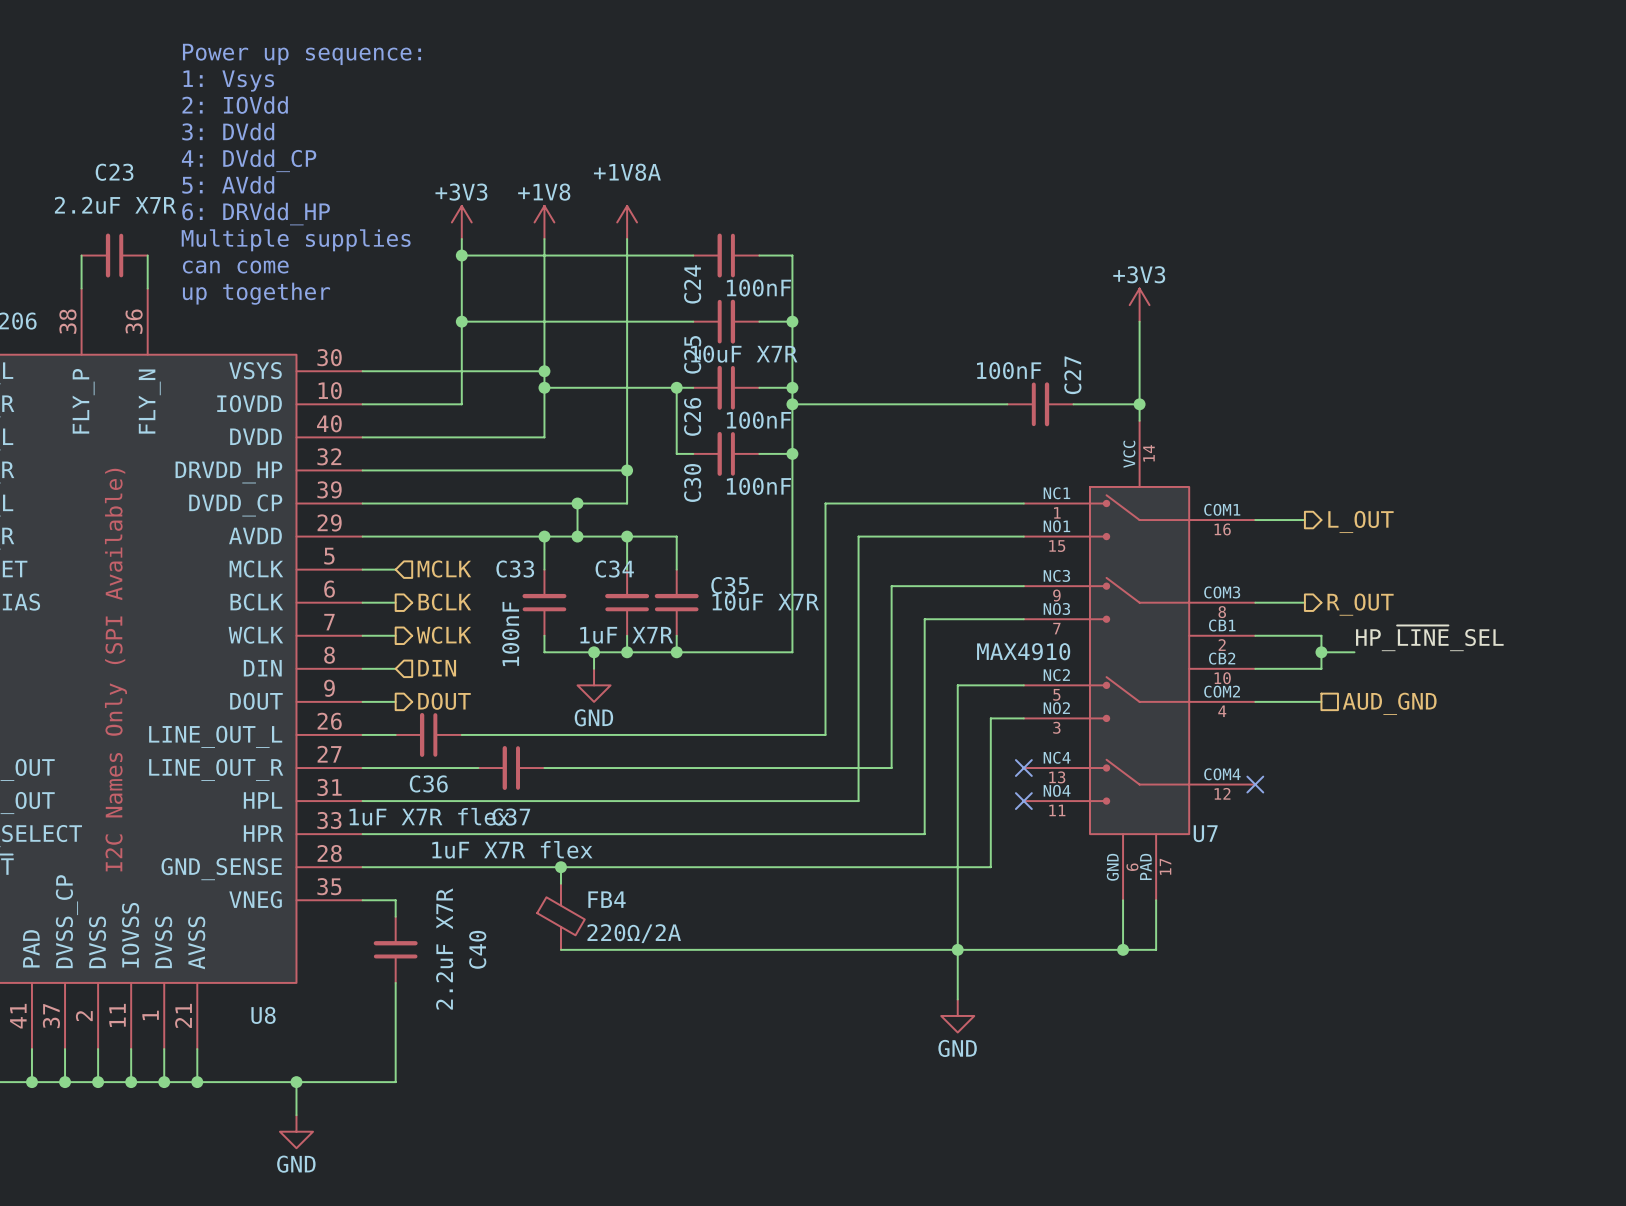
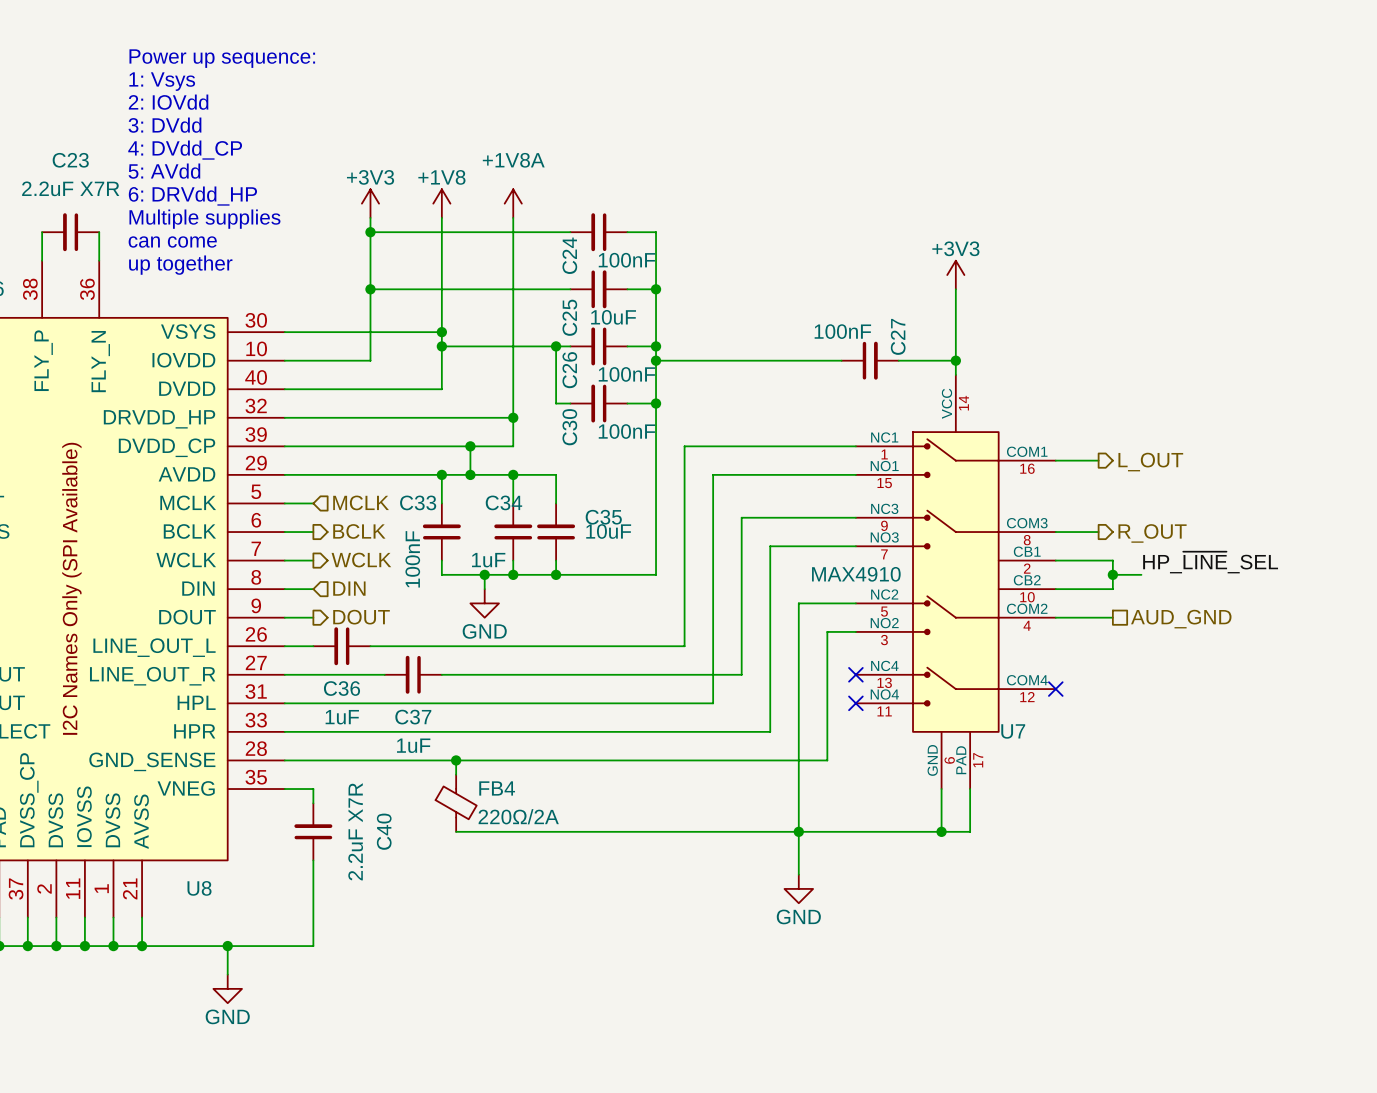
C25 value: 10uF X7R (744, 354) -> 10uF (613, 317)
C35 value: 10uF X7R (765, 602) -> 10uF (608, 531)
C34 value: 1uF X7R (626, 635) -> 1uF (488, 560)
C36 value: 1uF X7R flex (429, 816) -> 1uF (342, 717)
C37 value: 1uF X7R flex (512, 849) -> 1uF (413, 745)

